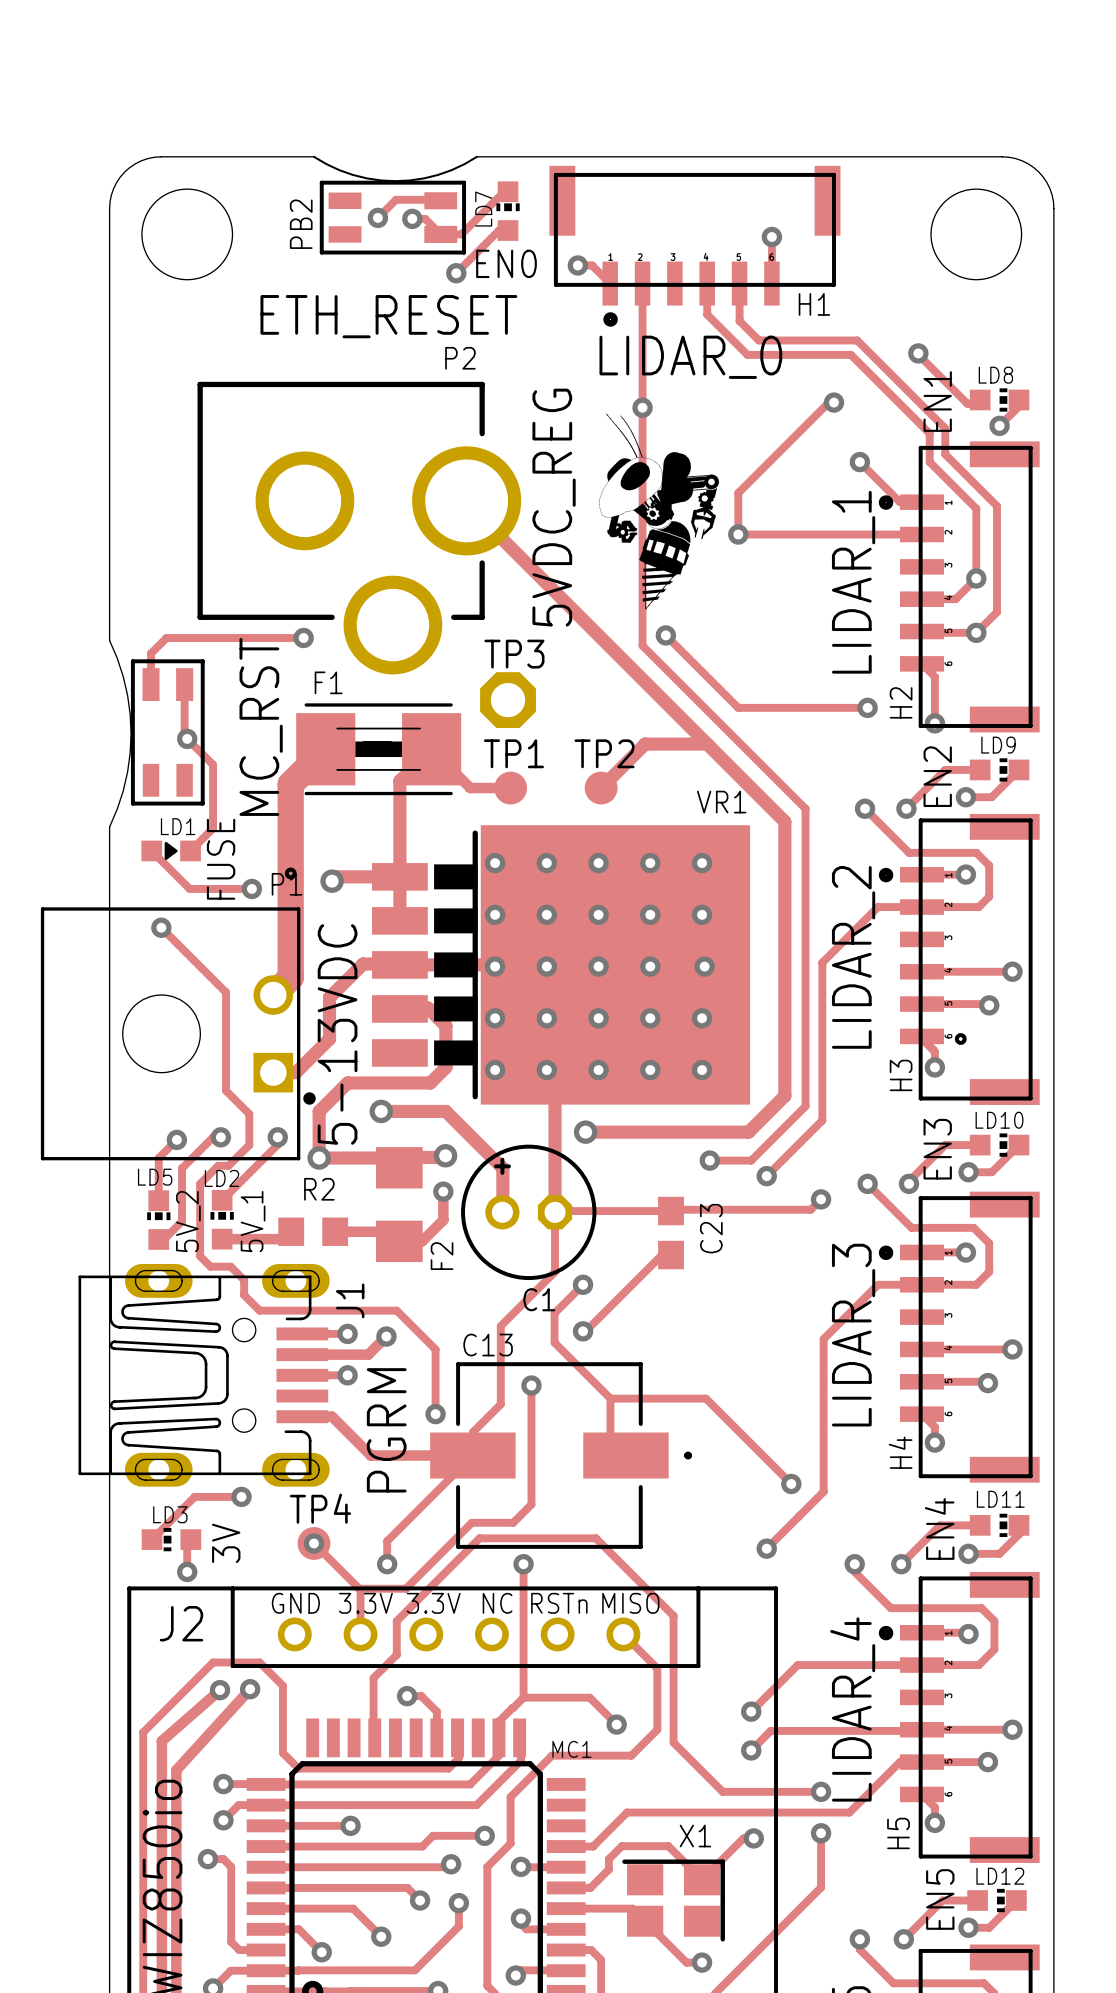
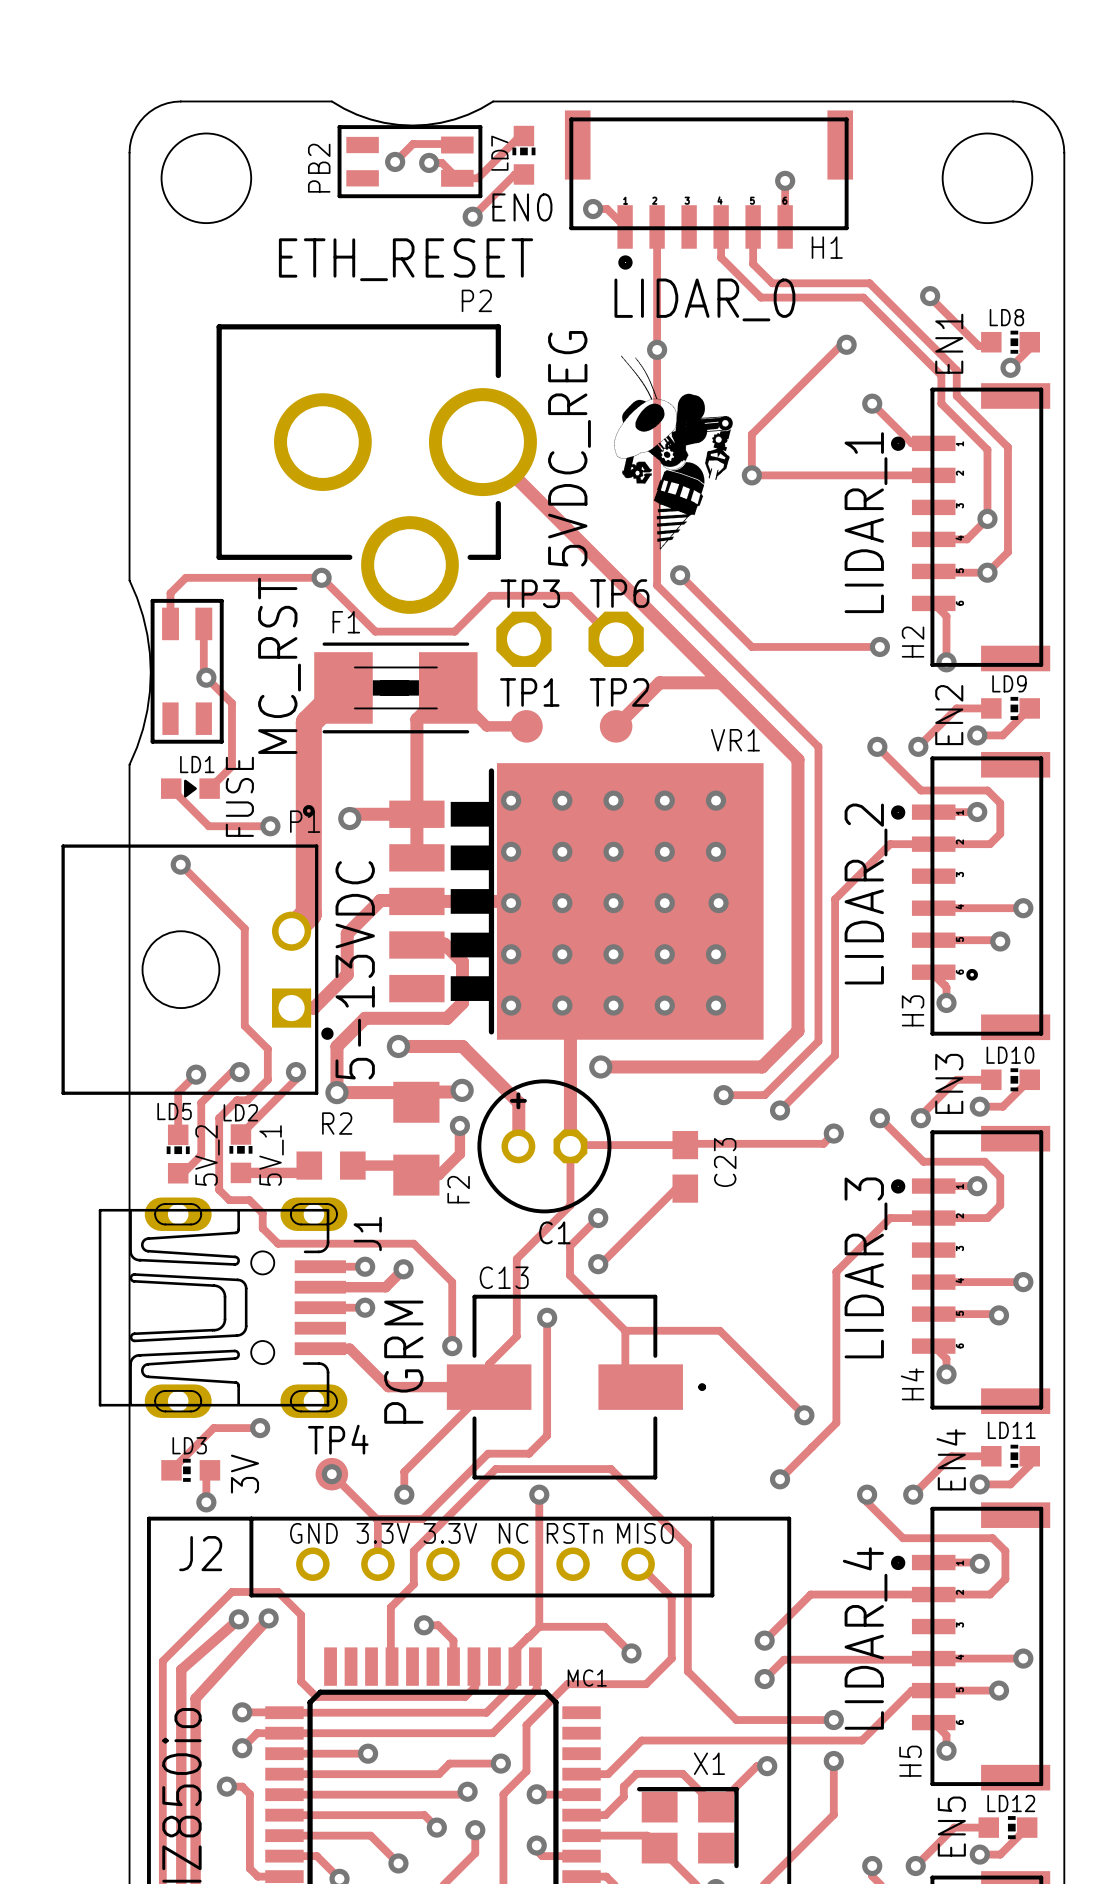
track: none -> (321, 577) (375, 631) (454, 631) (490, 595) (570, 595) (613, 639) (616, 639)
TP6: none -> (616, 639)

